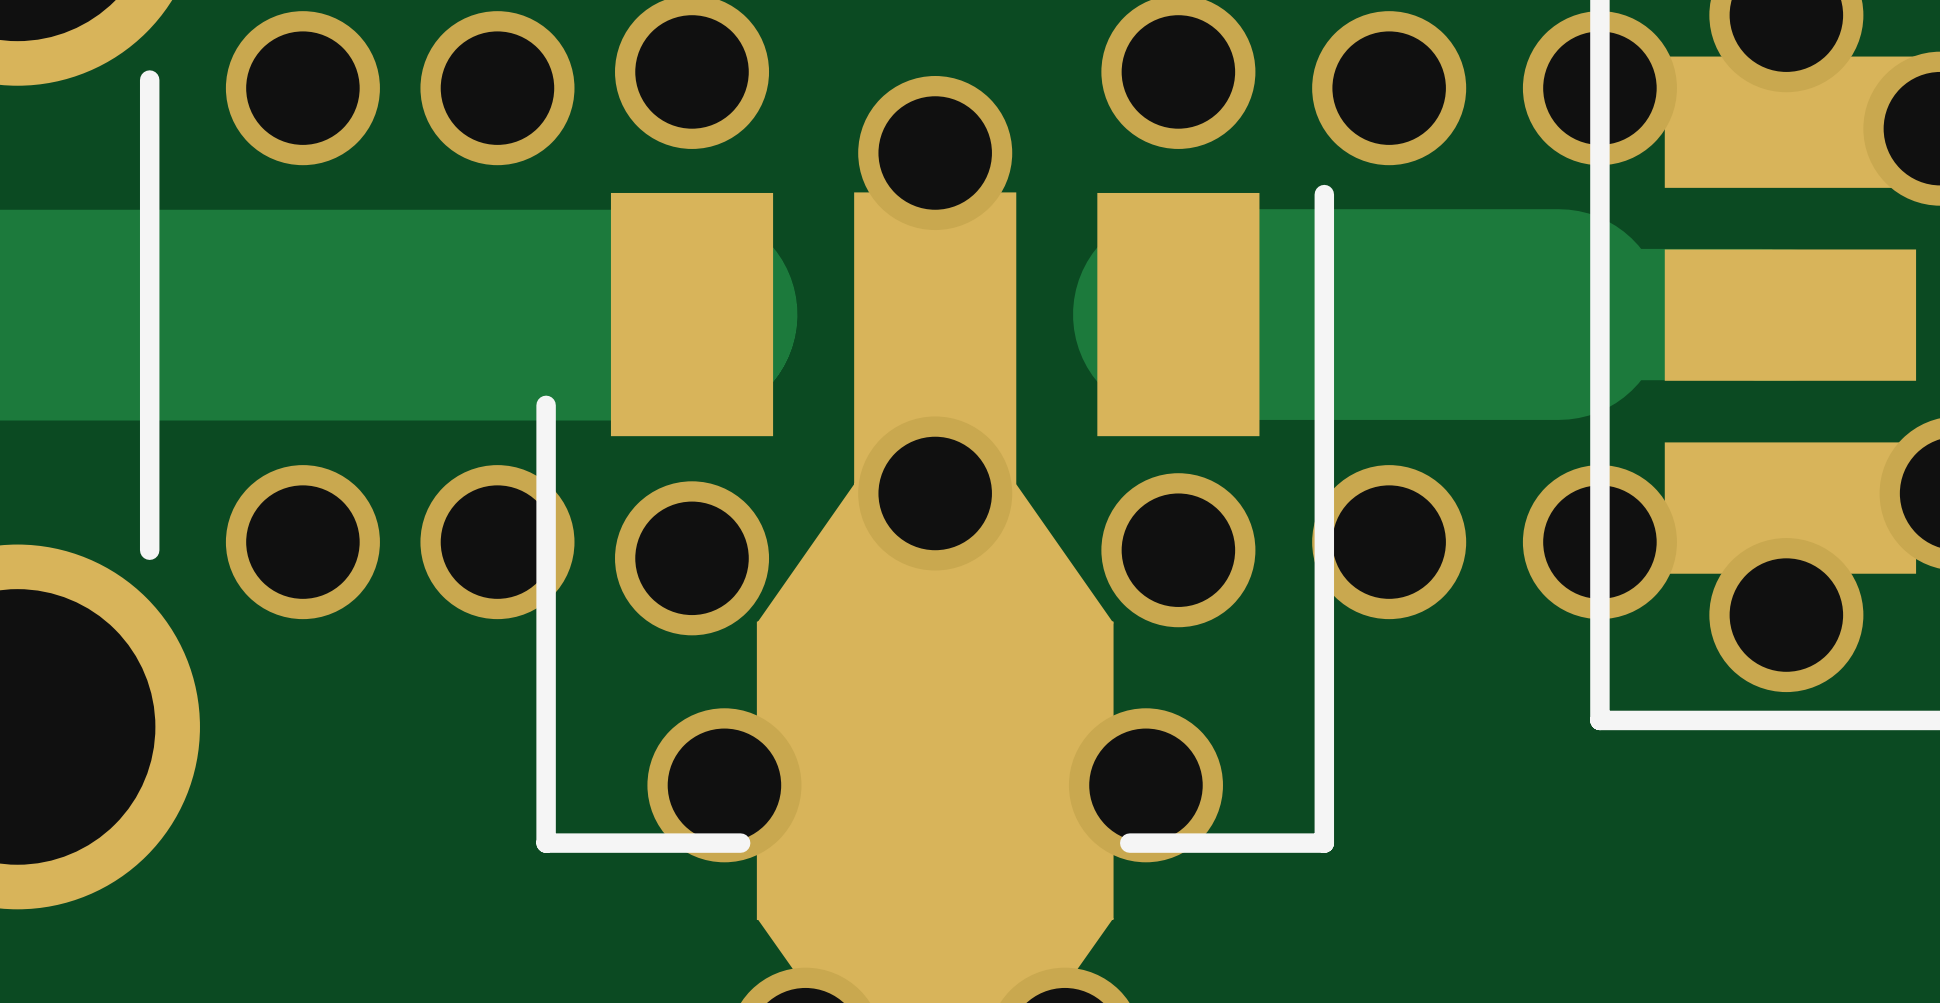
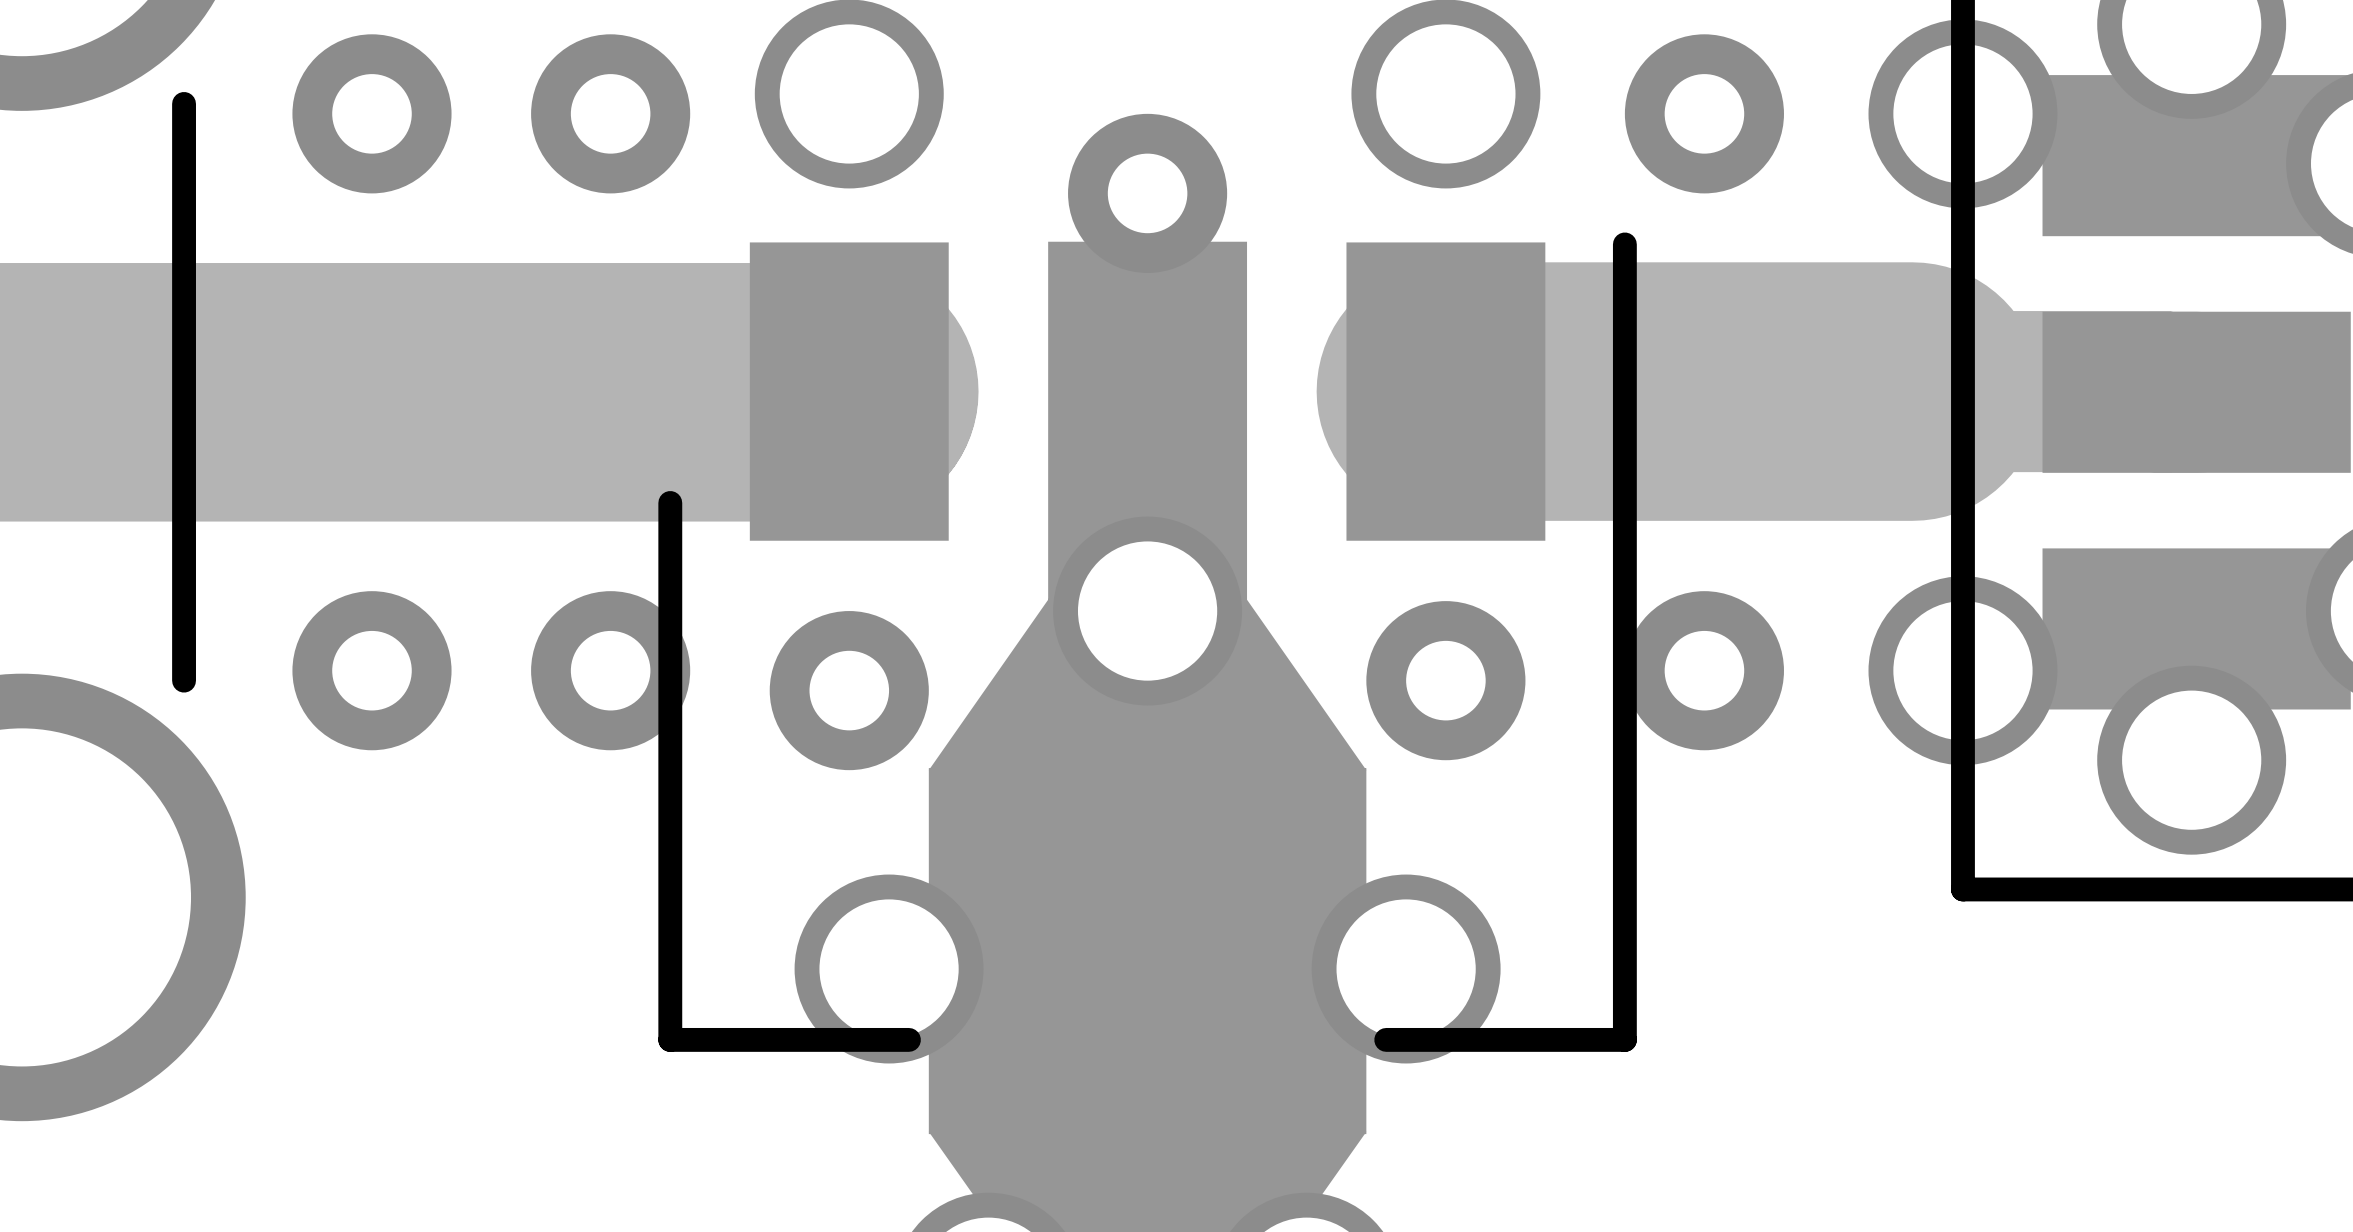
via size: [225, 11, 380, 166] -> [292, 34, 452, 194]
via size: [420, 11, 575, 166] -> [531, 34, 691, 194]
via size: [1312, 11, 1467, 166] -> [1624, 34, 1784, 194]
via size: [858, 75, 1013, 231] -> [1068, 113, 1228, 273]
via size: [225, 465, 380, 620] -> [292, 591, 452, 751]
via size: [420, 465, 575, 620] -> [531, 591, 691, 751]
via size: [1312, 465, 1467, 620] -> [1624, 591, 1784, 751]
via size: [1101, 473, 1256, 628] -> [1366, 601, 1526, 761]
via size: [615, 481, 770, 636] -> [769, 611, 929, 771]

